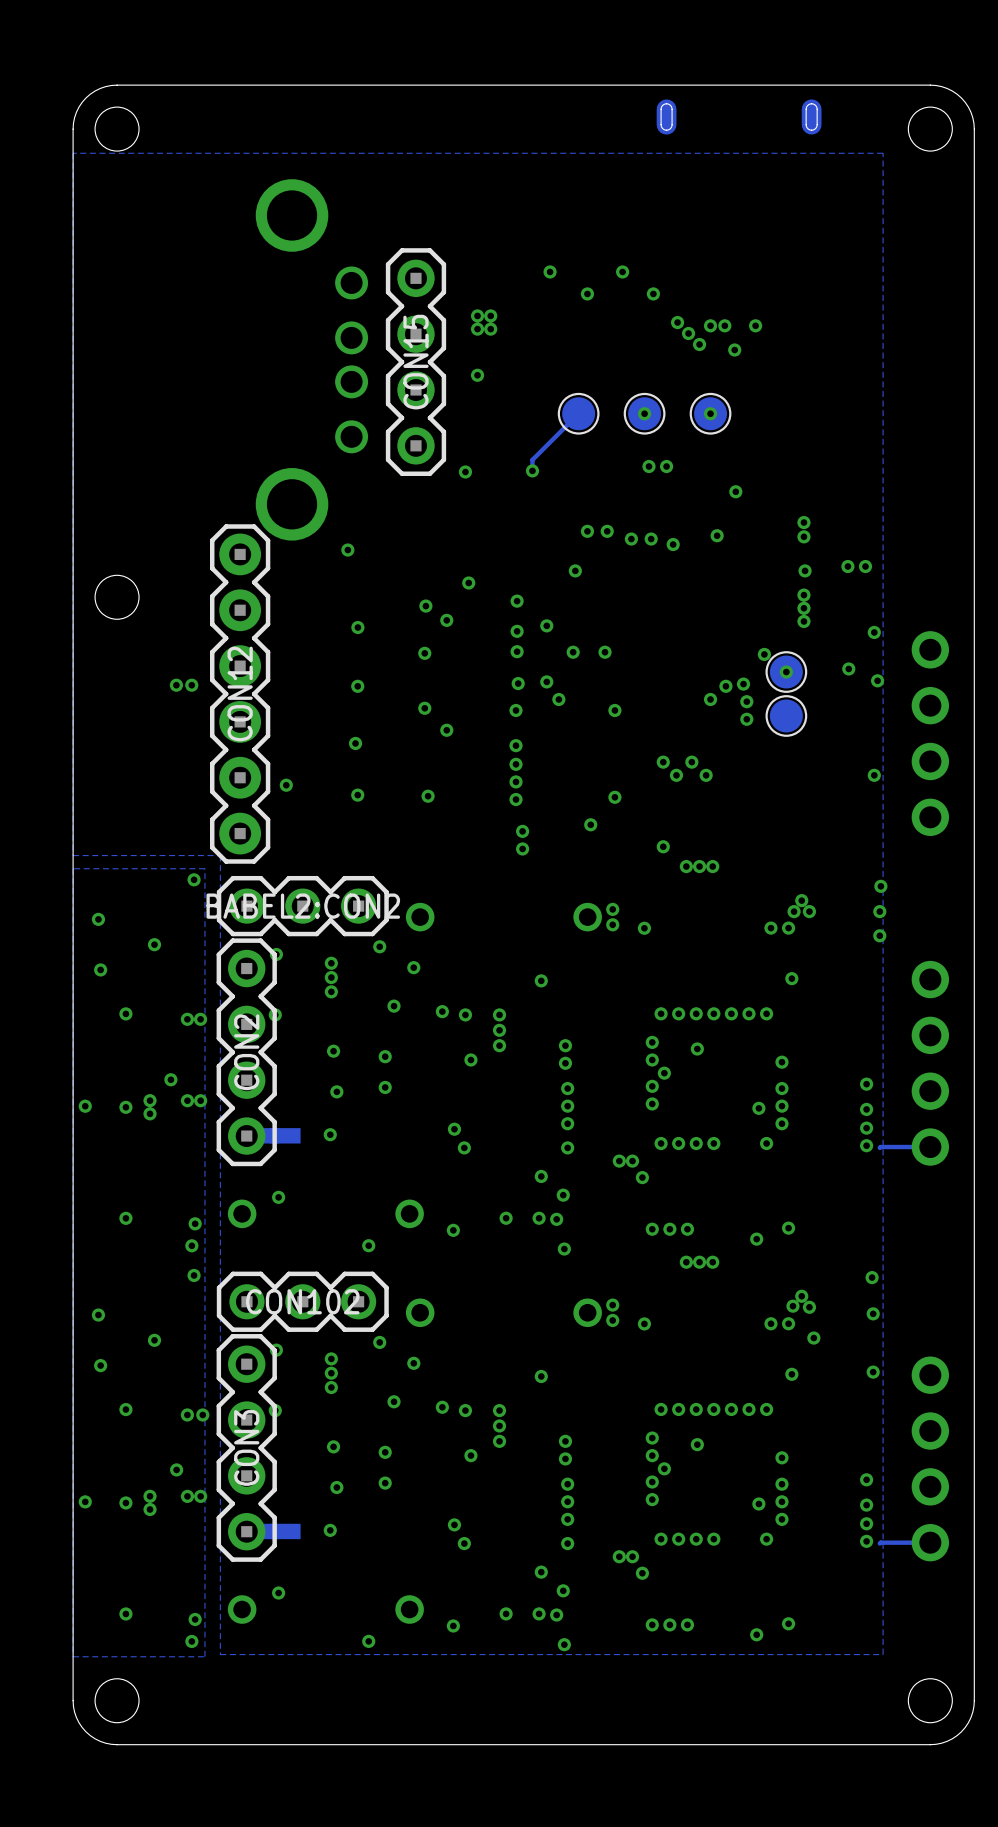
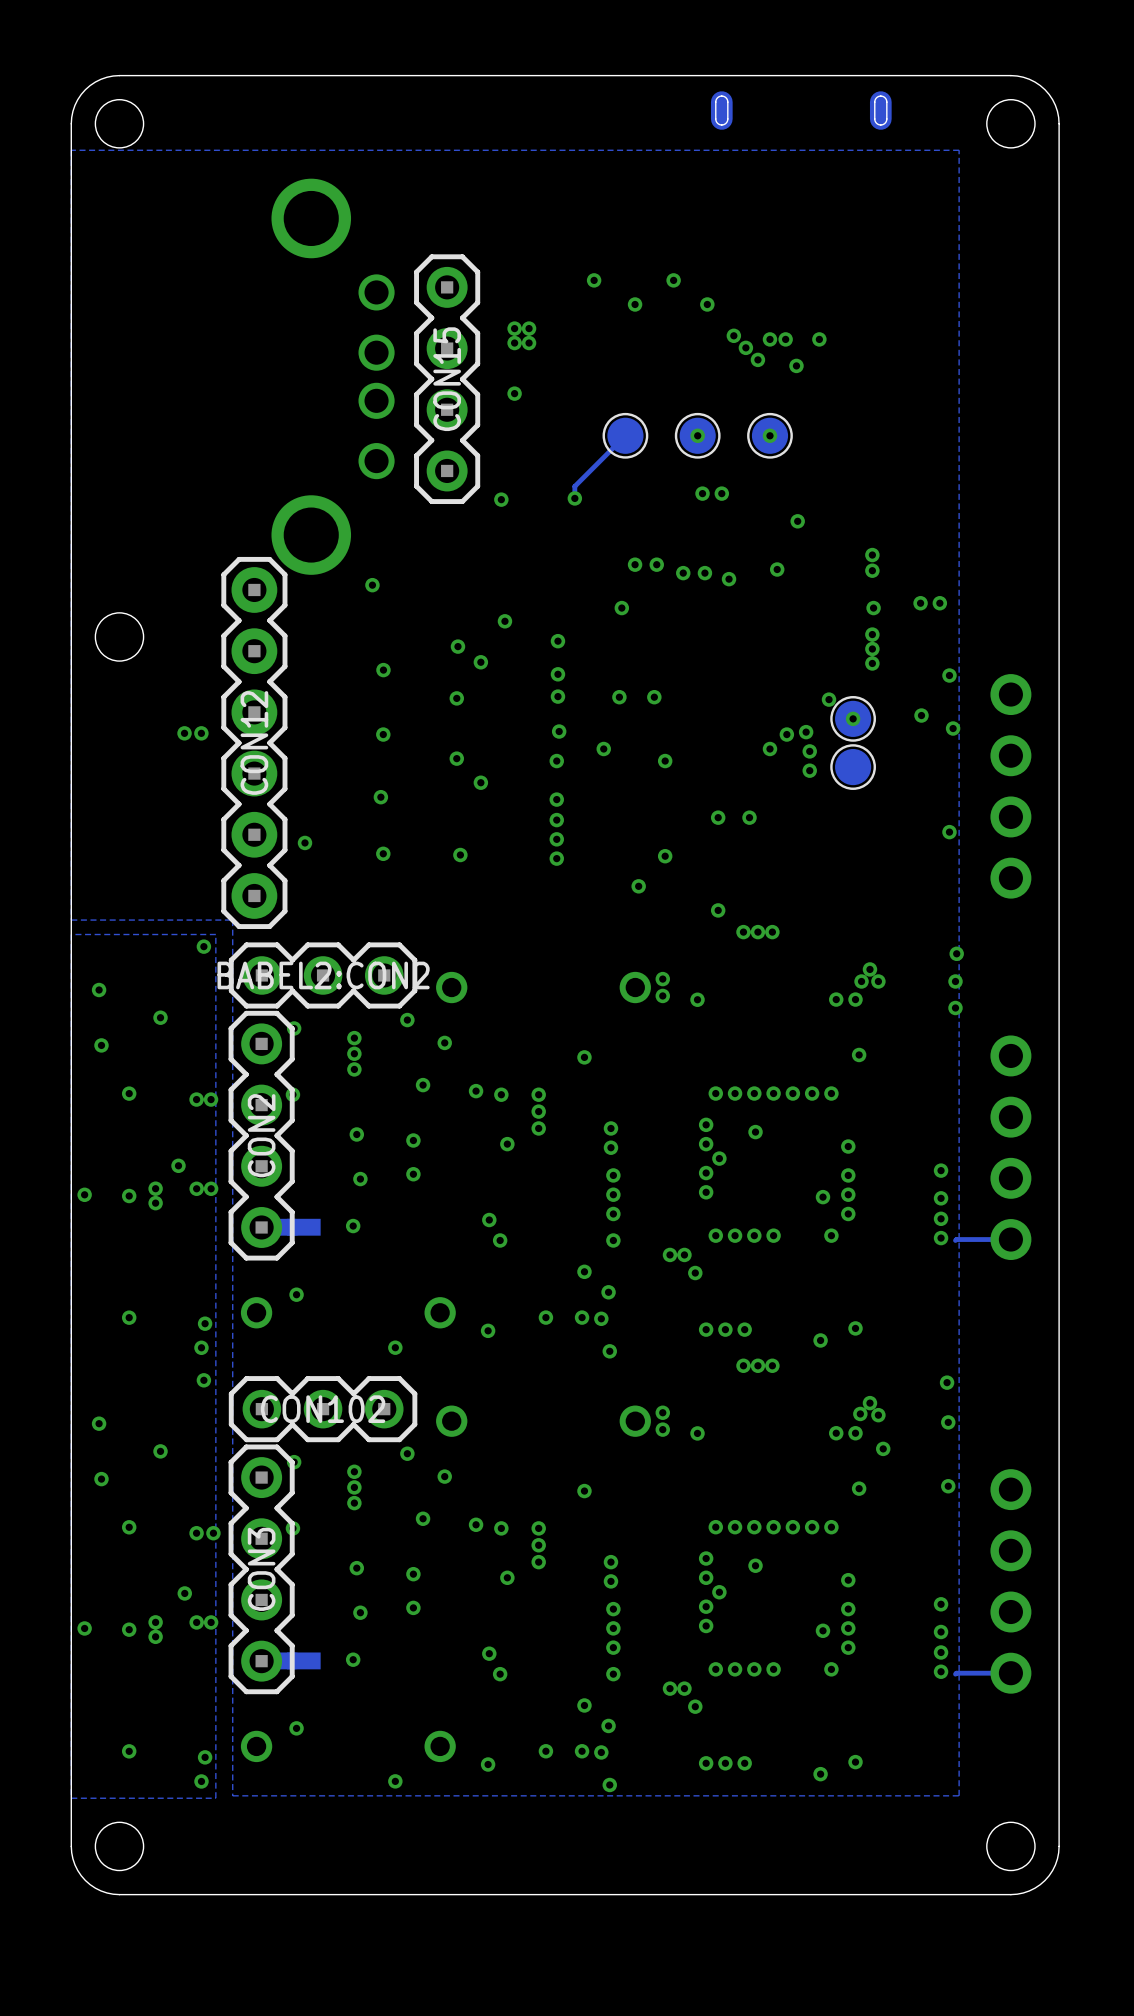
via: (546, 625) -> none
via: (546, 681) -> none
via: (676, 775) -> none
via: (706, 775) -> none
via: (522, 831) -> none
via: (522, 848) -> none

